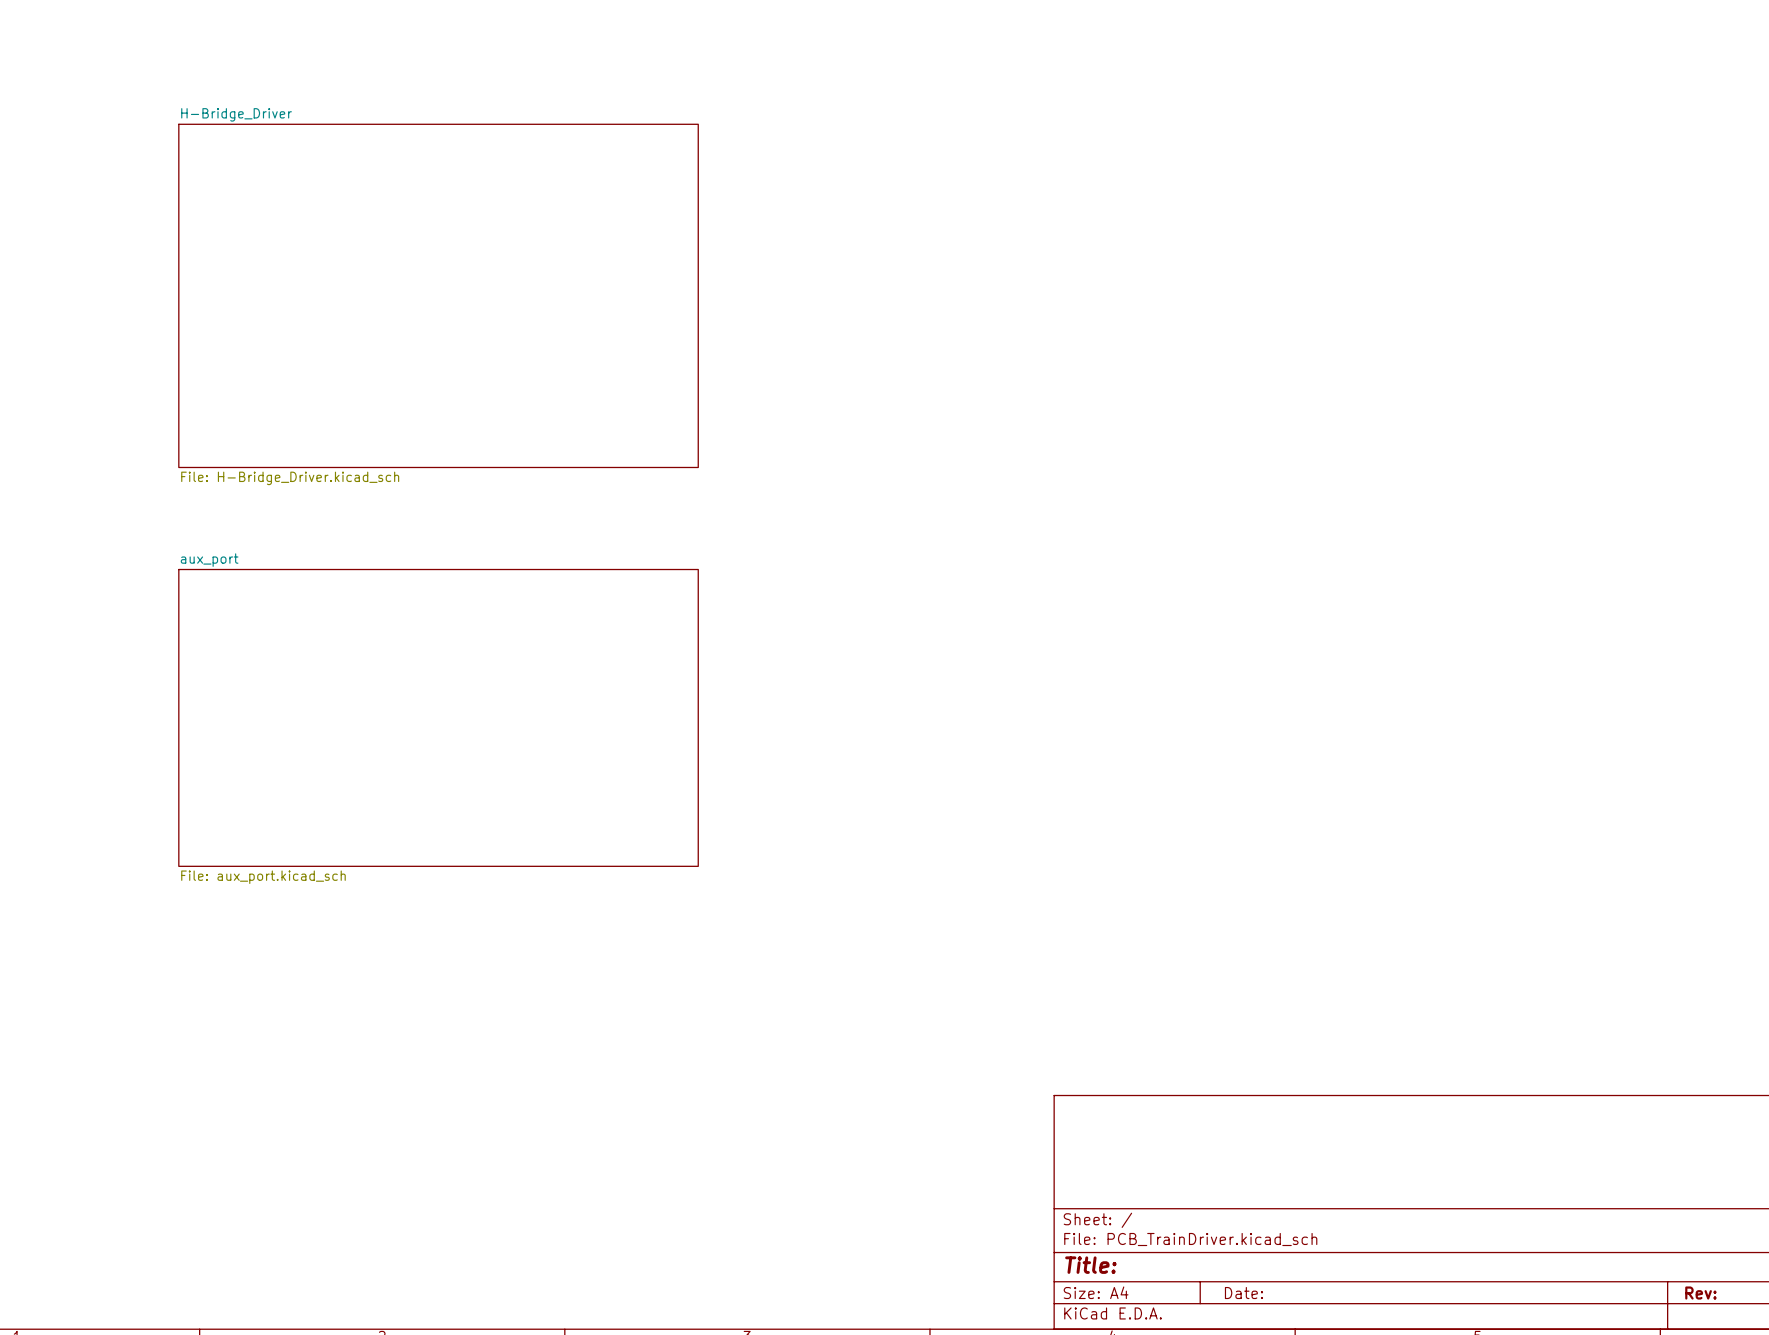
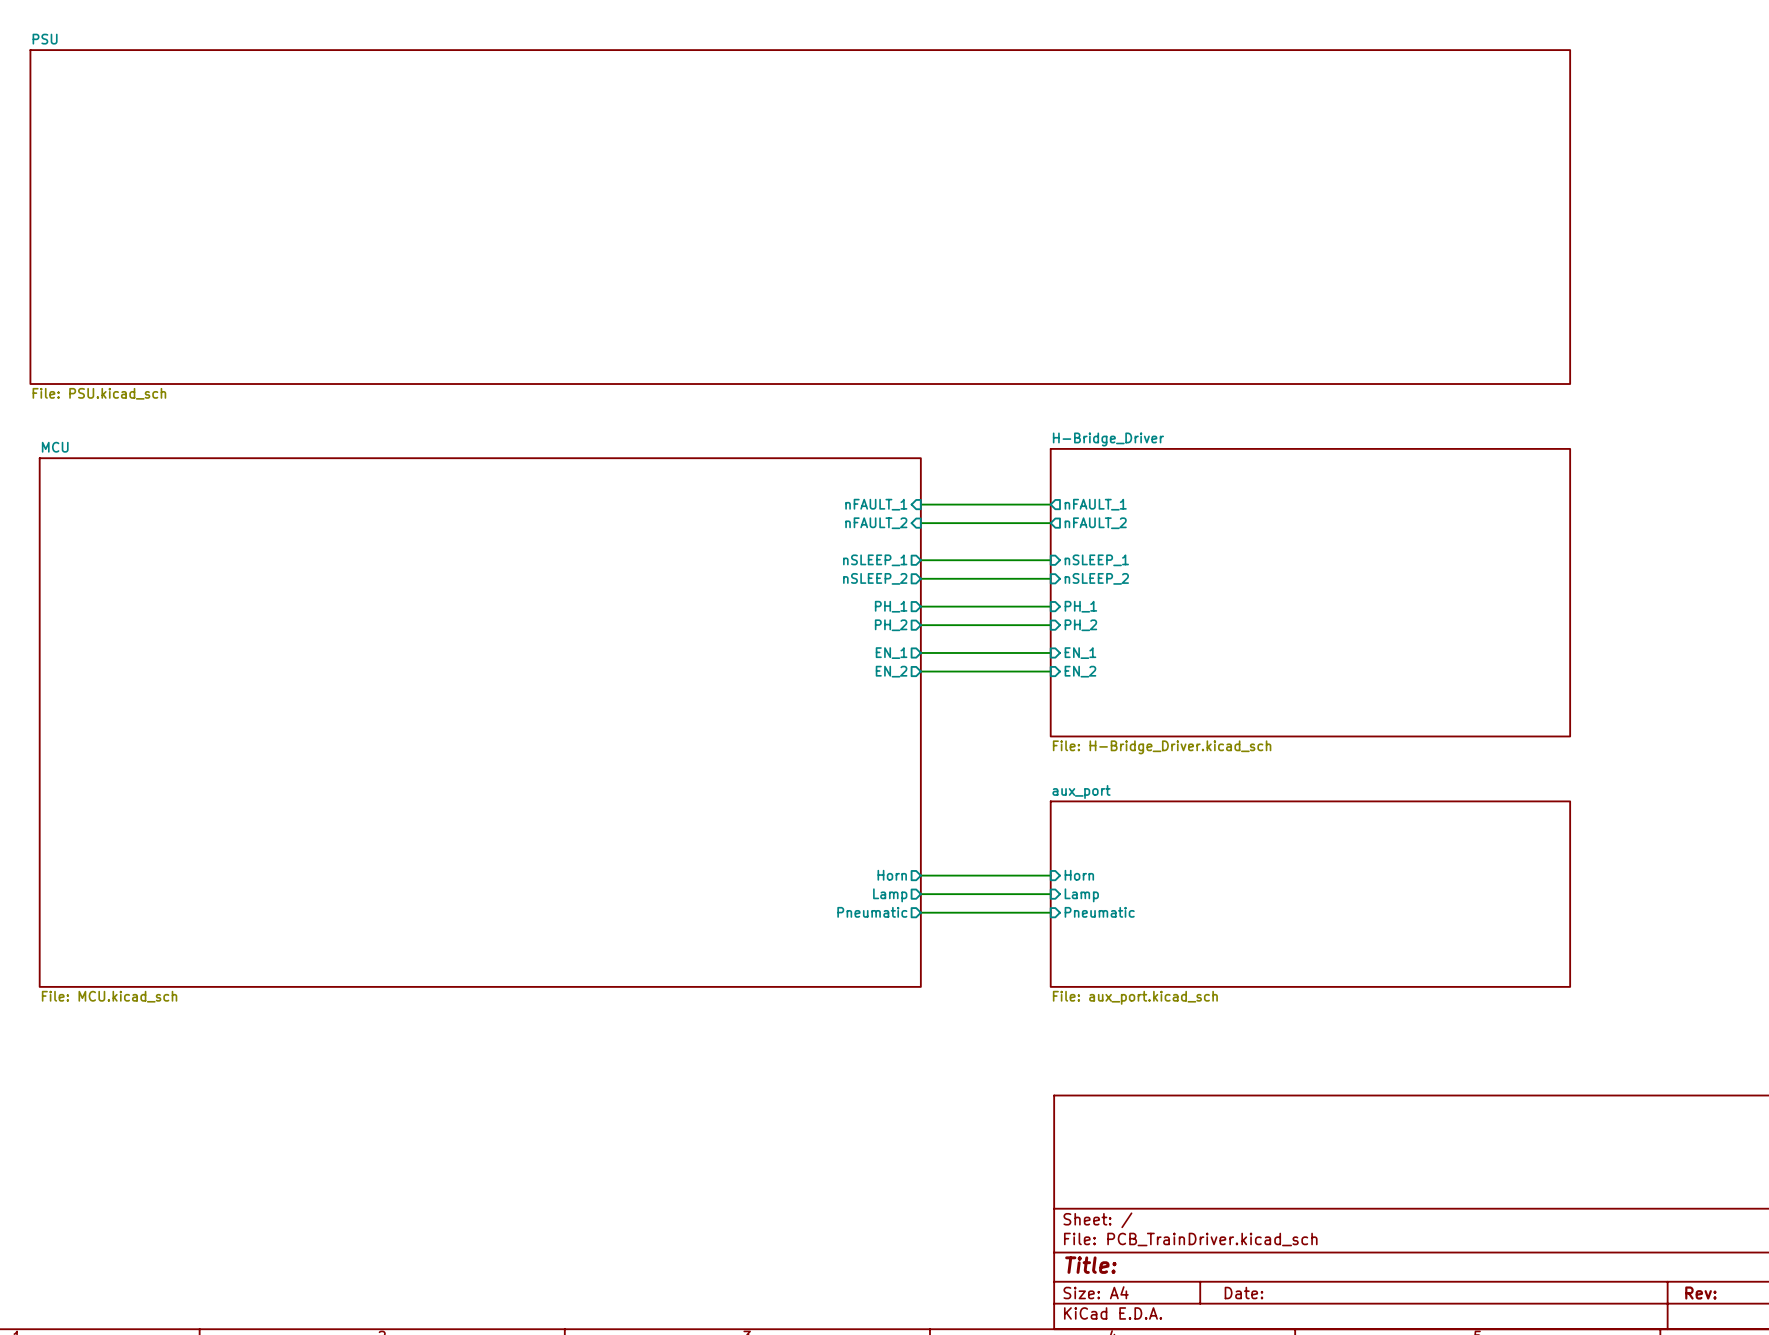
sheet PSU: none -> File: PSU.kicad_sch (800, 217)
sheet H-Bridge_Driver: File: H-Bridge_Driver.kicad_sch (438, 295) -> none
sheet pin: none -> nFAULT_1 (876, 504)
wire: none -> (920, 504) (1050, 504)
sheet pin: none -> nFAULT_1 (1095, 504)
sheet pin: none -> nFAULT_2 (876, 523)
wire: none -> (920, 523) (1050, 523)
sheet pin: none -> nFAULT_2 (1095, 523)
sheet pin: none -> nSLEEP_1 (875, 560)
wire: none -> (920, 560) (1050, 560)
sheet pin: none -> nSLEEP_1 (1096, 560)
sheet pin: none -> nSLEEP_2 (875, 578)
wire: none -> (920, 578) (1050, 578)
sheet pin: none -> nSLEEP_2 (1096, 578)
sheet H-Bridge_Driver: none -> File: H-Bridge_Driver.kicad_sch (1310, 592)
sheet pin: none -> PH_1 (891, 606)
wire: none -> (920, 606) (1050, 606)
sheet pin: none -> PH_1 (1080, 606)
sheet pin: none -> PH_2 (891, 625)
wire: none -> (920, 625) (1050, 625)
sheet pin: none -> PH_2 (1080, 625)
wire: none -> (920, 652) (1050, 652)
sheet pin: none -> EN_1 (891, 653)
sheet pin: none -> EN_1 (1080, 653)
sheet pin: none -> EN_2 (891, 671)
wire: none -> (920, 671) (1050, 671)
sheet pin: none -> EN_2 (1080, 671)
sheet aux_port: File: aux_port.kicad_sch (438, 717) -> none
sheet MCU: none -> File: MCU.kicad_sch (480, 722)
sheet pin: none -> Horn (892, 875)
wire: none -> (920, 875) (1050, 875)
sheet pin: none -> Horn (1079, 875)
wire: none -> (920, 894) (1050, 894)
sheet aux_port: none -> File: aux_port.kicad_sch (1310, 894)
sheet pin: none -> Lamp (890, 895)
sheet pin: none -> Lamp (1081, 895)
sheet pin: none -> Pneumatic (872, 912)
wire: none -> (920, 912) (1050, 912)
sheet pin: none -> Pneumatic (1099, 912)

